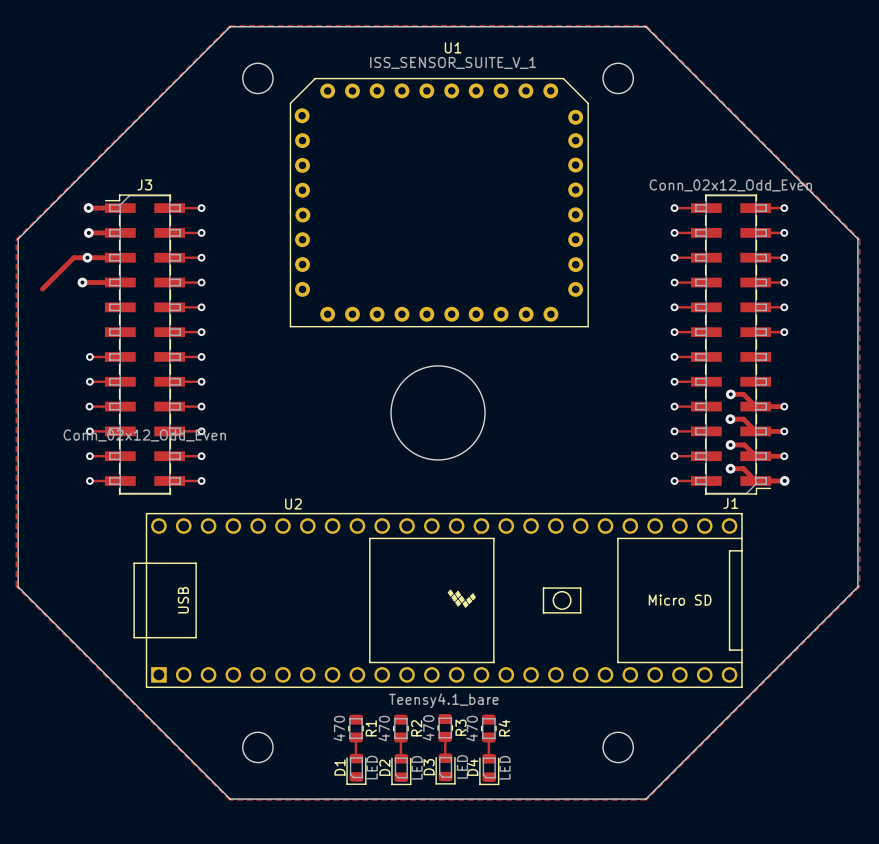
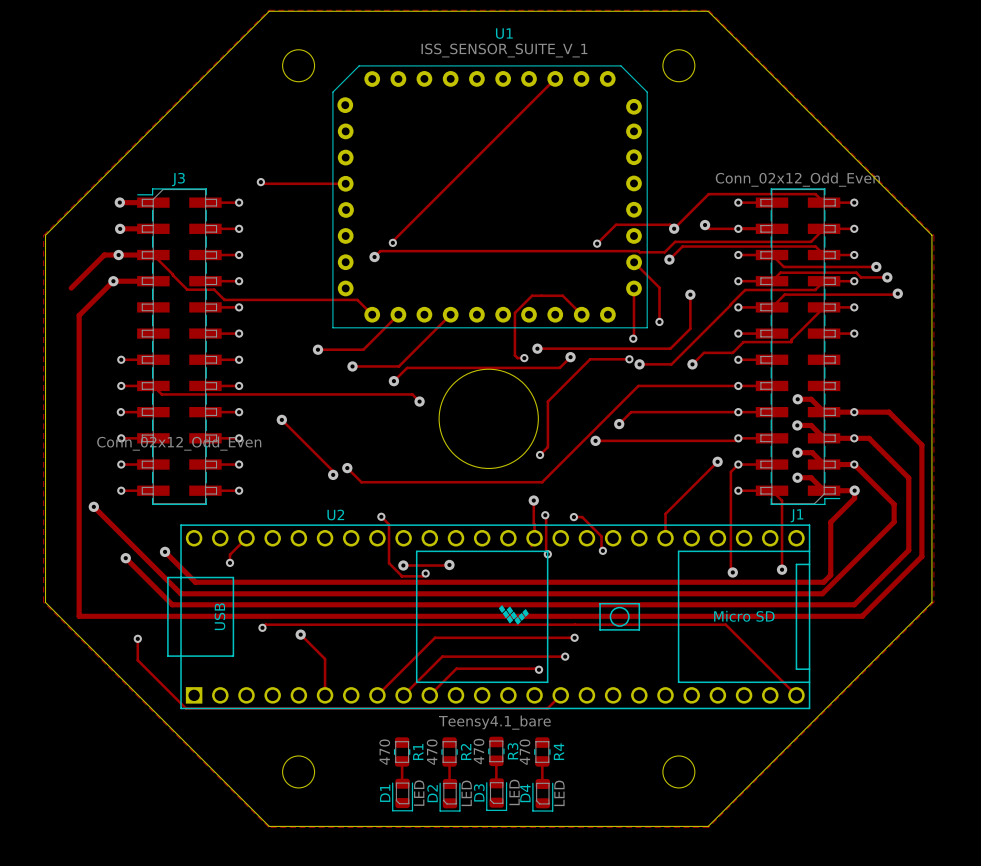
track: none -> (555, 78) (392, 242)
track: none -> (260, 182) (262, 183) (345, 183)
via: none -> (260, 182)
track: none -> (824, 202) (815, 194) (708, 194) (674, 228) (670, 224) (616, 224) (597, 243)
track: none -> (705, 225) (708, 228) (738, 228)
via: none -> (705, 225)
via: none -> (674, 228)
track: none -> (824, 228) (811, 241) (675, 241) (664, 252) (380, 251) (374, 257)
via: none -> (392, 242)
via: none -> (597, 243)
track: none -> (153, 255) (187, 289) (214, 289) (224, 299) (357, 299) (372, 314)
track: none -> (772, 255) (783, 266) (876, 266)
track: none -> (824, 255) (815, 246) (682, 246) (669, 259)
via: none -> (374, 257)
via: none -> (669, 259)
track: none -> (634, 262) (659, 287) (659, 321)
via: none -> (876, 266)
track: none -> (887, 277) (861, 277) (856, 272) (780, 272) (772, 281)
via: none -> (887, 277)
track: none -> (113, 281) (79, 315) (79, 616) (862, 616) (921, 556) (921, 445) (889, 412) (854, 412)
track: none -> (824, 281) (815, 290) (745, 290) (671, 364) (639, 364)
track: none -> (633, 288) (633, 338)
track: none -> (897, 293) (784, 294) (772, 307)
via: none -> (897, 293)
track: none -> (690, 294) (690, 328) (670, 348) (537, 348)
via: none -> (690, 294)
track: none -> (824, 307) (791, 339) (791, 342) (743, 342) (732, 352) (704, 352) (692, 364)
track: none -> (398, 314) (363, 349) (317, 349)
track: none -> (450, 314) (398, 366) (352, 366)
track: none -> (581, 314) (562, 295) (532, 295) (514, 312) (514, 355) (517, 358) (524, 358)
via: none -> (659, 321)
via: none -> (633, 338)
via: none -> (537, 348)
via: none -> (317, 349)
track: none -> (570, 357) (559, 367) (407, 367) (393, 381)
via: none -> (570, 357)
via: none -> (524, 358)
track: none -> (629, 359) (590, 359) (547, 401) (547, 447) (540, 454)
via: none -> (629, 359)
via: none -> (639, 364)
via: none -> (692, 364)
via: none -> (352, 366)
via: none -> (393, 381)
track: none -> (153, 385) (161, 394) (412, 394) (419, 401)
track: none -> (738, 385) (638, 385) (542, 482) (361, 482) (347, 468)
via: none -> (419, 401)
track: none -> (738, 412) (631, 412) (619, 424)
track: none -> (281, 419) (333, 471) (333, 474)
via: none -> (281, 419)
via: none -> (619, 424)
track: none -> (738, 438) (735, 440) (595, 440)
track: none -> (854, 438) (869, 438) (908, 478) (908, 550) (854, 604) (172, 604) (125, 558)
via: none -> (595, 440)
via: none -> (540, 454)
track: none -> (717, 461) (665, 513) (665, 538)
via: none -> (717, 461)
track: none -> (738, 464) (730, 471) (730, 570) (732, 572)
track: none -> (854, 464) (894, 504) (894, 522) (822, 593) (180, 593) (93, 506)
via: none -> (347, 468)
via: none -> (333, 474)
track: none -> (854, 490) (854, 498) (830, 522) (830, 575) (823, 582) (195, 582) (165, 551)
track: none -> (772, 490) (782, 500) (782, 569)
track: none -> (533, 500) (534, 538)
via: none -> (533, 500)
via: none -> (93, 506)
track: none -> (545, 515) (546, 552) (547, 554)
via: none -> (545, 515)
track: none -> (381, 516) (389, 524) (389, 563) (401, 576) (422, 576) (425, 573)
via: none -> (381, 516)
track: none -> (573, 517) (582, 517) (601, 536) (602, 550)
via: none -> (573, 517)
track: none -> (246, 538) (229, 554) (229, 562)
via: none -> (602, 550)
via: none -> (165, 551)
via: none -> (547, 554)
via: none -> (125, 558)
via: none -> (229, 562)
via: none -> (403, 565)
track: none -> (449, 564) (403, 565)
via: none -> (449, 564)
via: none -> (782, 569)
via: none -> (732, 572)
via: none -> (425, 573)
track: none -> (262, 627) (265, 624) (725, 624) (796, 695)
via: none -> (262, 627)
track: none -> (300, 634) (325, 659) (325, 695)
via: none -> (300, 634)
track: none -> (574, 637) (435, 637) (377, 695)
via: none -> (574, 637)
track: none -> (137, 638) (137, 660) (185, 708) (547, 708) (560, 695)
via: none -> (137, 638)
track: none -> (565, 656) (442, 656) (403, 695)
via: none -> (565, 656)
track: none -> (539, 669) (456, 668) (429, 695)
via: none -> (539, 669)

